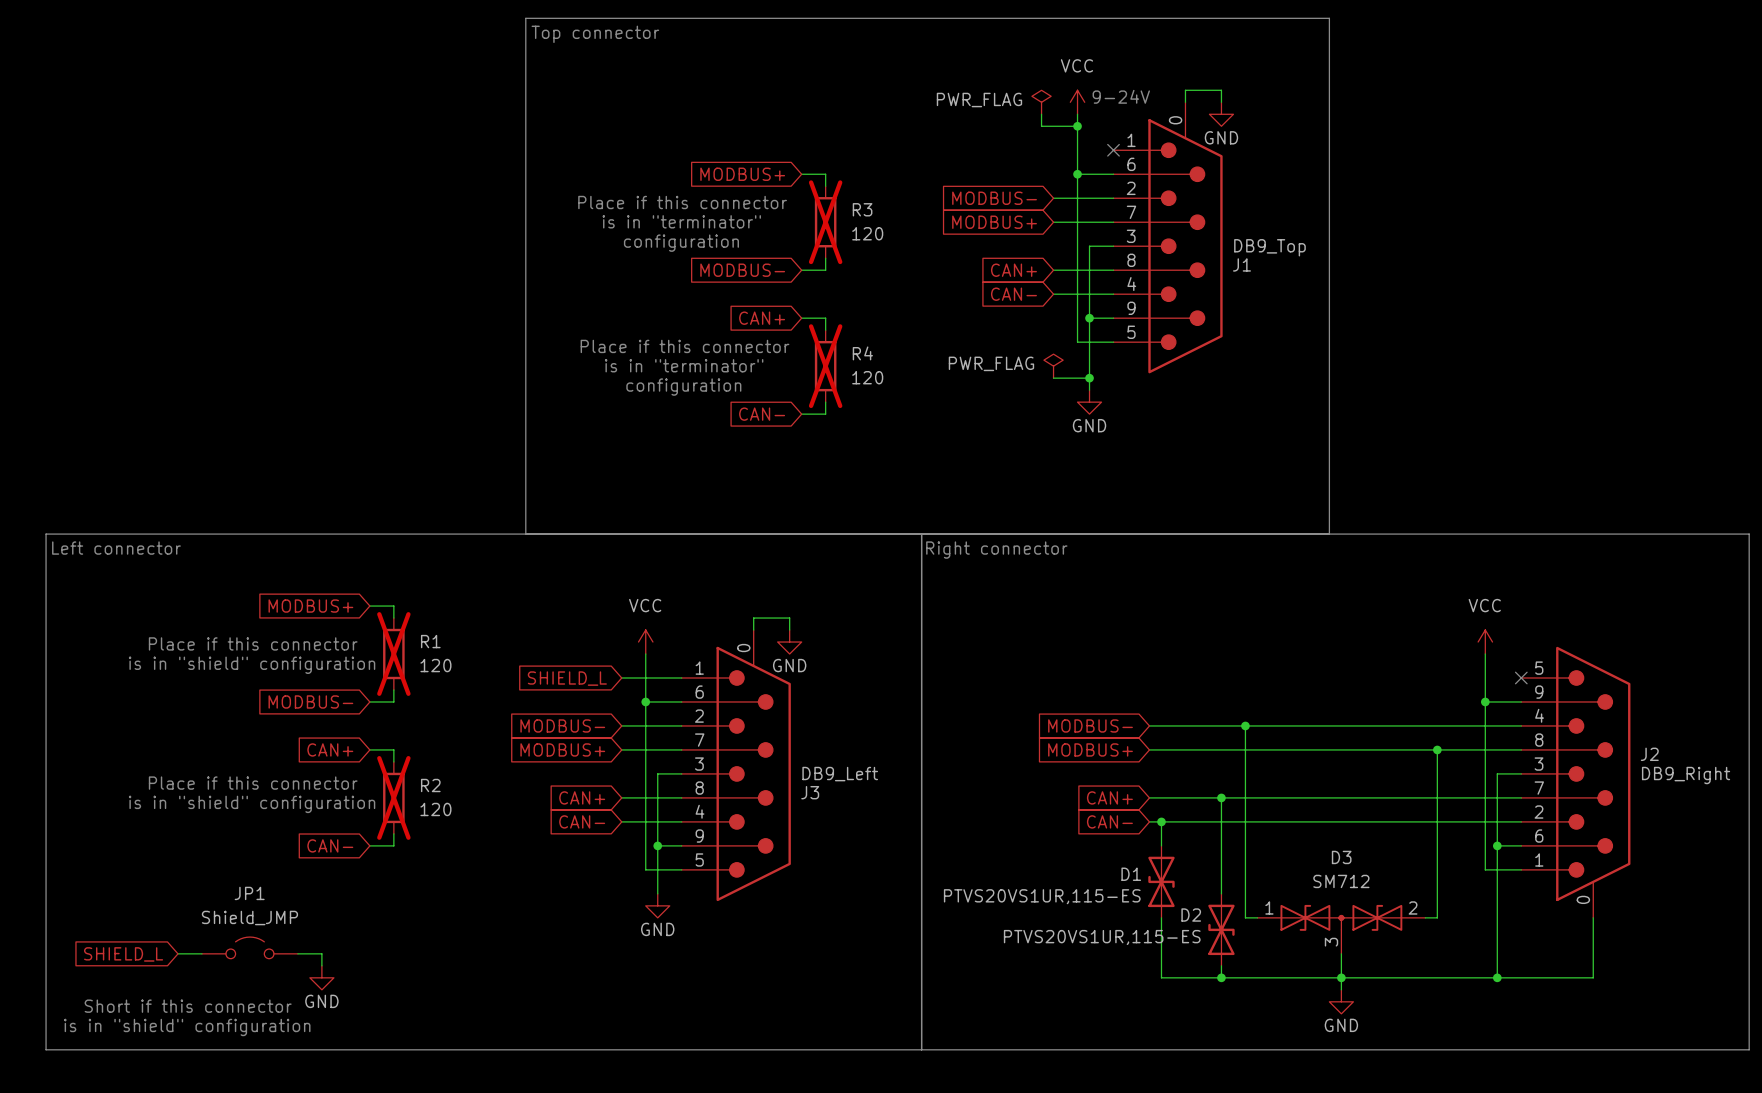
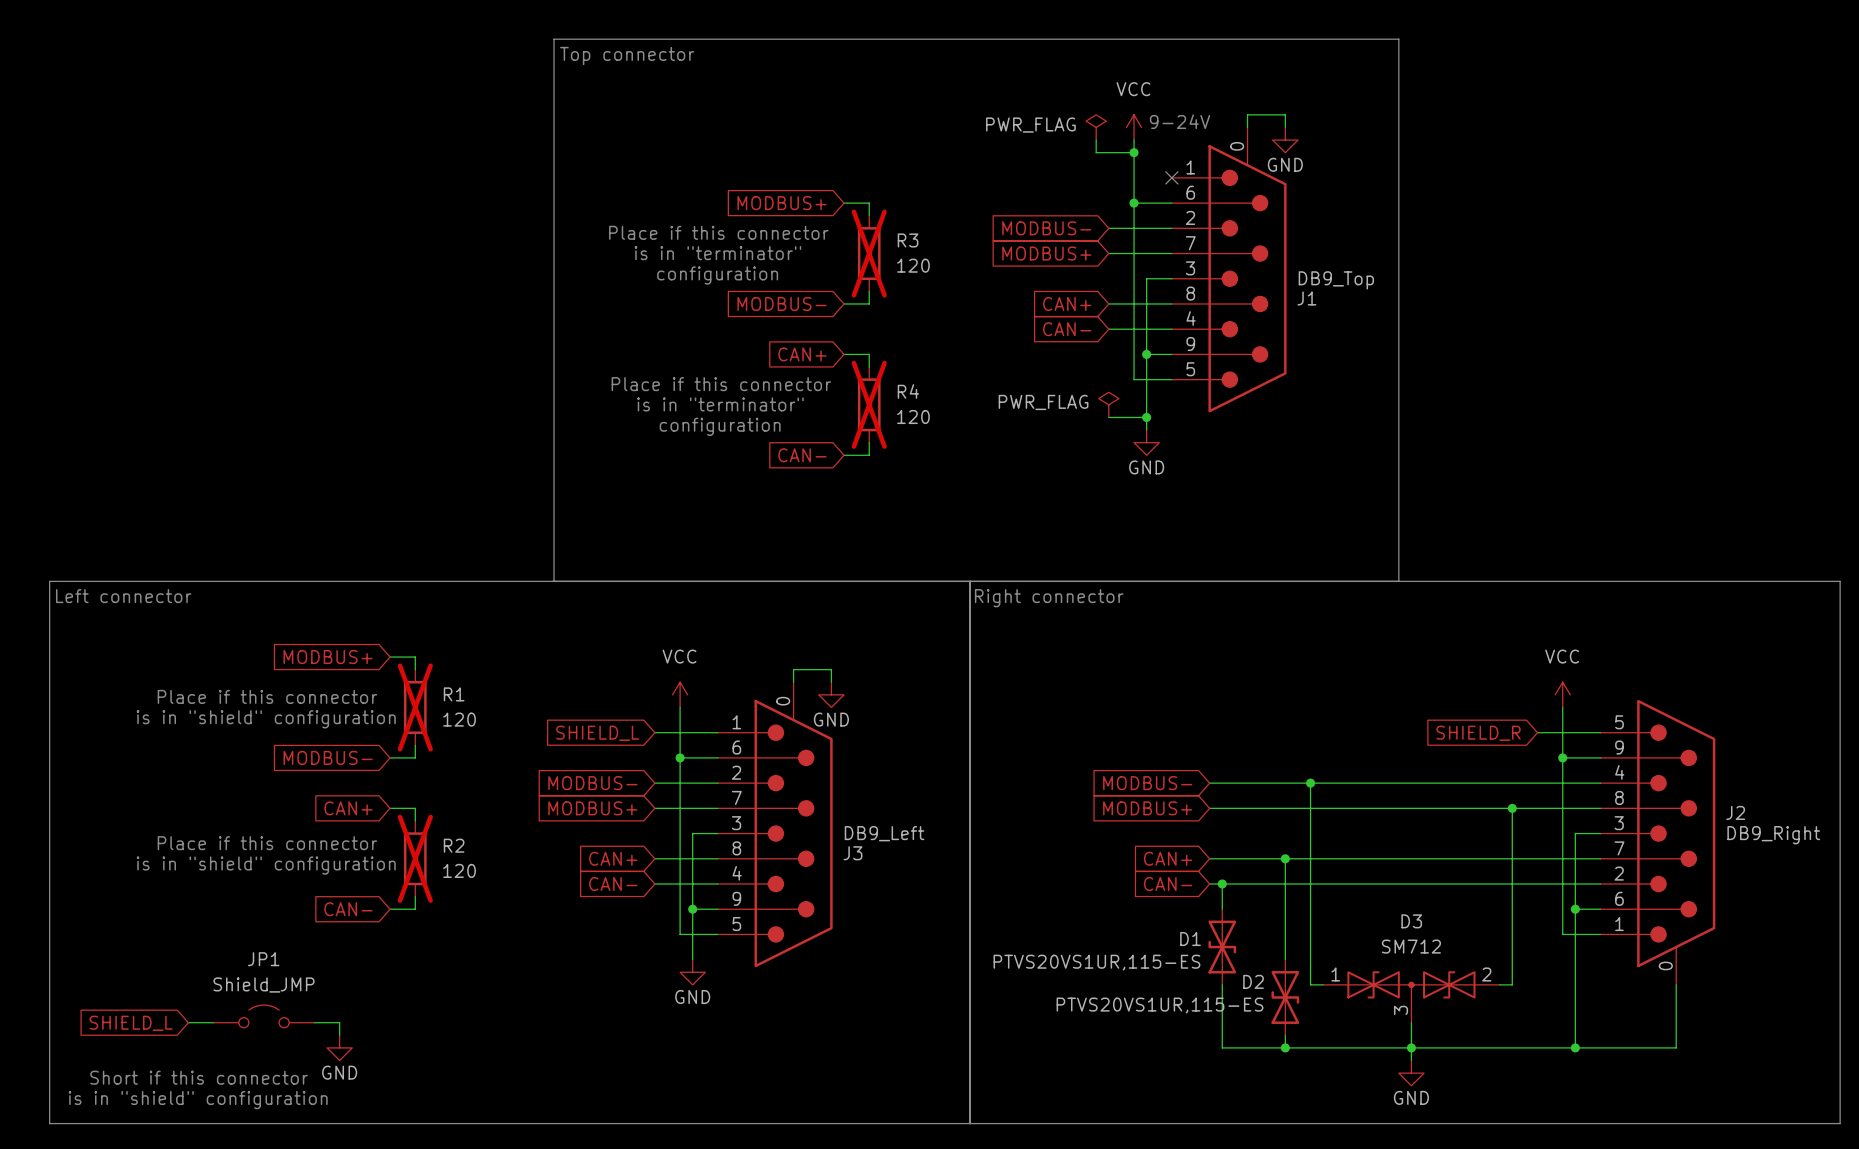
global label: none -> SHIELD_R (1478, 733)
wire: none -> (1537, 732) (1600, 732)
no-connect mark: (1521, 678) -> none

